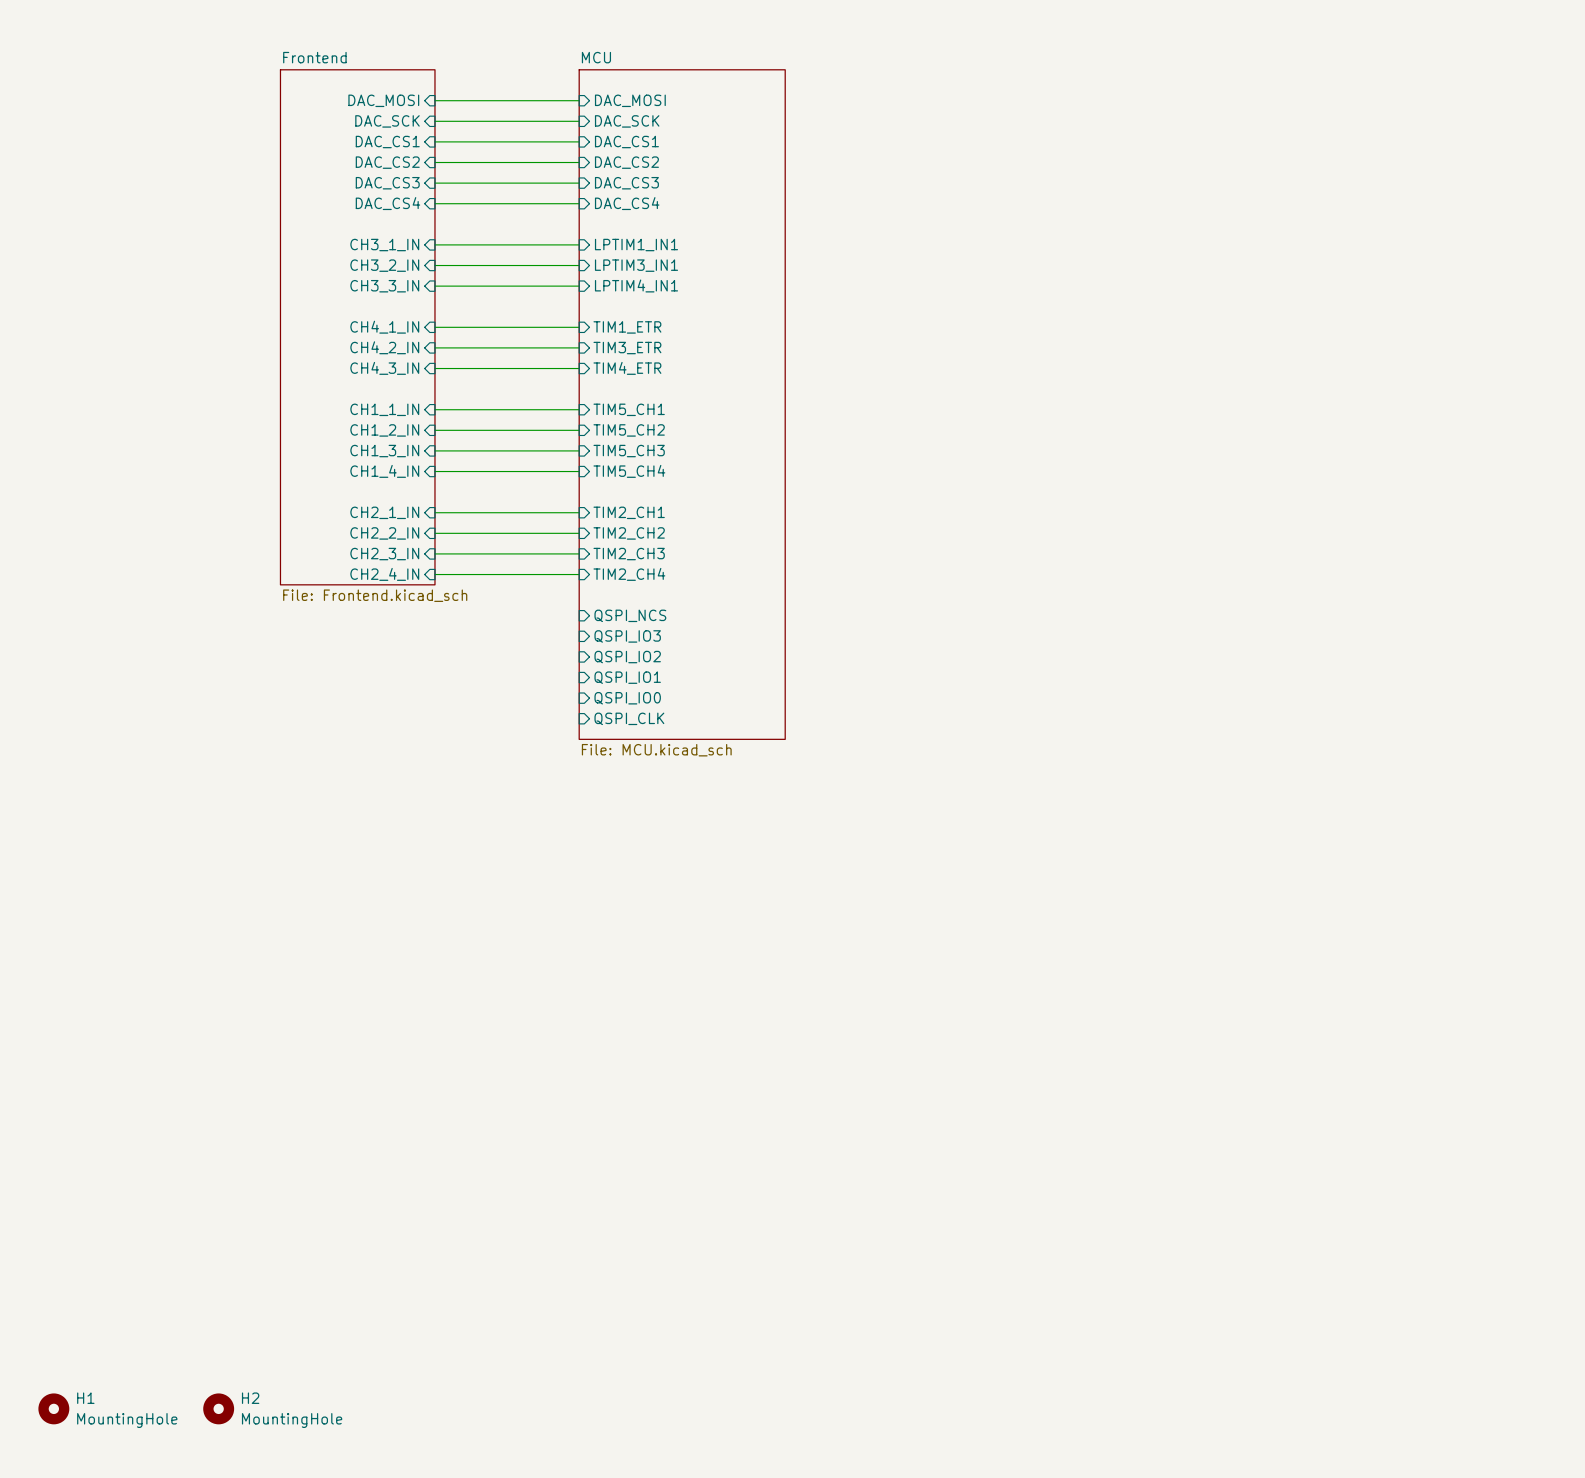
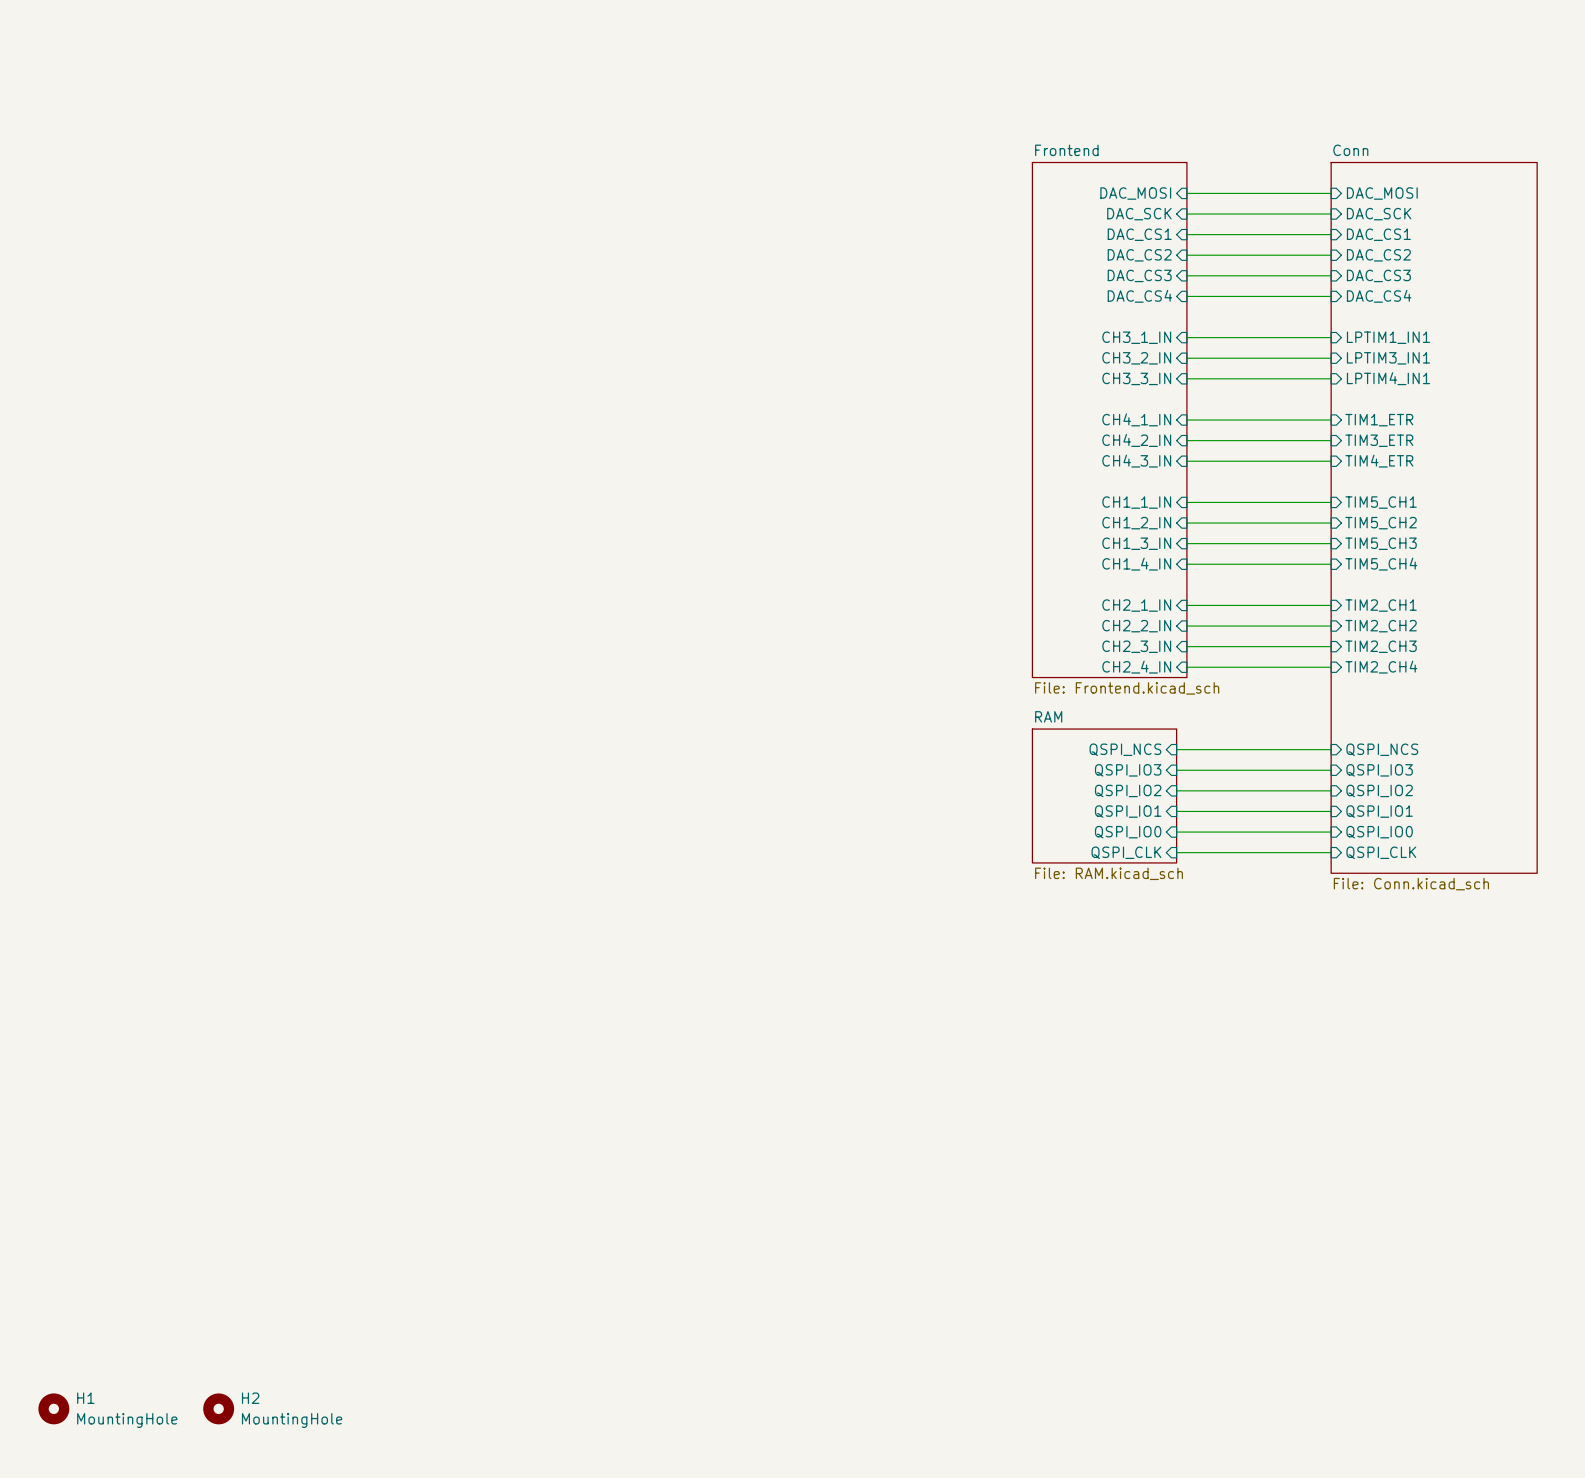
sheet pin: DAC_MOSI (383, 100) -> none
wire: (434, 100) (579, 100) -> none
sheet pin: DAC_MOSI (630, 100) -> none
sheet pin: DAC_SCK (387, 121) -> none
wire: (434, 121) (579, 121) -> none
sheet pin: DAC_SCK (627, 121) -> none
wire: (434, 141) (579, 141) -> none
sheet pin: DAC_CS1 (387, 142) -> none
sheet pin: DAC_CS1 (626, 142) -> none
sheet pin: DAC_CS2 (387, 162) -> none
wire: (434, 162) (579, 162) -> none
sheet pin: DAC_CS2 (626, 162) -> none
sheet pin: DAC_CS3 (387, 183) -> none
wire: (434, 183) (579, 183) -> none
sheet pin: DAC_CS3 (626, 183) -> none
sheet pin: none -> DAC_MOSI (1135, 193)
wire: none -> (1186, 193) (1331, 193)
sheet pin: none -> DAC_MOSI (1382, 193)
sheet pin: DAC_CS4 (387, 203) -> none
wire: (434, 203) (579, 203) -> none
sheet pin: DAC_CS4 (627, 203) -> none
sheet pin: none -> DAC_SCK (1139, 214)
wire: none -> (1186, 214) (1331, 214)
sheet pin: none -> DAC_SCK (1379, 214)
sheet pin: none -> DAC_CS1 (1139, 234)
wire: none -> (1186, 234) (1331, 234)
sheet pin: none -> DAC_CS1 (1378, 234)
wire: (434, 244) (579, 244) -> none
sheet pin: CH3_1_IN (384, 245) -> none
sheet pin: LPTIM1_IN1 (636, 245) -> none
sheet pin: none -> DAC_CS2 (1139, 255)
wire: none -> (1186, 255) (1331, 255)
sheet pin: none -> DAC_CS2 (1378, 255)
sheet pin: CH3_2_IN (384, 265) -> none
wire: (434, 265) (579, 265) -> none
sheet pin: LPTIM3_IN1 (636, 265) -> none
sheet pin: none -> DAC_CS3 (1139, 275)
wire: none -> (1186, 275) (1331, 275)
sheet pin: none -> DAC_CS3 (1378, 275)
sheet pin: LPTIM4_IN1 (636, 285) -> none
sheet pin: CH3_3_IN (384, 286) -> none
wire: (434, 286) (579, 286) -> none
sheet pin: none -> DAC_CS4 (1139, 296)
wire: none -> (1186, 296) (1331, 296)
sheet pin: none -> DAC_CS4 (1379, 296)
sheet Frontend: File: Frontend.kicad_sch (357, 327) -> none
sheet pin: CH4_1_IN (384, 327) -> none
wire: (434, 327) (579, 327) -> none
sheet pin: TIM1_ETR (627, 327) -> none
sheet pin: none -> CH3_1_IN (1136, 337)
wire: none -> (1186, 337) (1331, 337)
sheet pin: none -> LPTIM1_IN1 (1388, 337)
sheet pin: CH4_2_IN (384, 347) -> none
wire: (434, 347) (579, 347) -> none
sheet pin: TIM3_ETR (627, 348) -> none
sheet pin: none -> CH3_2_IN (1136, 358)
wire: none -> (1186, 358) (1331, 358)
sheet pin: none -> LPTIM3_IN1 (1388, 358)
sheet pin: CH4_3_IN (384, 368) -> none
wire: (434, 368) (579, 368) -> none
sheet pin: TIM4_ETR (627, 368) -> none
sheet pin: none -> CH3_3_IN (1136, 378)
wire: none -> (1186, 378) (1331, 378)
sheet pin: none -> LPTIM4_IN1 (1388, 378)
sheet MCU: File: MCU.kicad_sch (682, 404) -> none
sheet pin: CH1_1_IN (384, 409) -> none
wire: (434, 409) (579, 409) -> none
sheet pin: TIM5_CH1 (629, 409) -> none
sheet pin: none -> CH4_1_IN (1136, 419)
sheet Frontend: none -> File: Frontend.kicad_sch (1109, 420)
wire: none -> (1186, 420) (1331, 420)
sheet pin: none -> TIM1_ETR (1379, 420)
sheet pin: CH1_2_IN (384, 430) -> none
wire: (434, 430) (579, 430) -> none
sheet pin: TIM5_CH2 (629, 430) -> none
sheet pin: none -> CH4_2_IN (1136, 440)
wire: none -> (1186, 440) (1331, 440)
sheet pin: none -> TIM3_ETR (1379, 440)
wire: (434, 450) (579, 450) -> none
sheet pin: CH1_3_IN (384, 451) -> none
sheet pin: TIM5_CH3 (629, 451) -> none
sheet pin: none -> CH4_3_IN (1136, 461)
wire: none -> (1186, 461) (1331, 461)
sheet pin: none -> TIM4_ETR (1379, 461)
sheet pin: CH1_4_IN (384, 471) -> none
wire: (434, 471) (579, 471) -> none
sheet pin: TIM5_CH4 (629, 471) -> none
sheet pin: none -> CH1_1_IN (1136, 502)
wire: none -> (1186, 502) (1331, 502)
sheet pin: none -> TIM5_CH1 (1381, 502)
sheet pin: CH2_1_IN (384, 512) -> none
wire: (434, 512) (579, 512) -> none
sheet pin: TIM2_CH1 (629, 512) -> none
sheet Conn: none -> File: Conn.kicad_sch (1434, 517)
sheet pin: none -> CH1_2_IN (1136, 523)
wire: none -> (1186, 523) (1331, 523)
sheet pin: none -> TIM5_CH2 (1381, 523)
sheet pin: CH2_2_IN (384, 533) -> none
wire: (434, 533) (579, 533) -> none
sheet pin: TIM2_CH2 (629, 533) -> none
sheet pin: none -> CH1_3_IN (1136, 543)
wire: none -> (1186, 543) (1331, 543)
sheet pin: none -> TIM5_CH3 (1381, 543)
wire: (434, 553) (579, 553) -> none
sheet pin: CH2_3_IN (384, 554) -> none
sheet pin: TIM2_CH3 (629, 554) -> none
sheet pin: none -> CH1_4_IN (1136, 564)
wire: none -> (1186, 564) (1331, 564)
sheet pin: none -> TIM5_CH4 (1381, 564)
sheet pin: CH2_4_IN (384, 574) -> none
wire: (434, 574) (579, 574) -> none
sheet pin: TIM2_CH4 (629, 574) -> none
sheet pin: none -> CH2_1_IN (1136, 605)
wire: none -> (1186, 605) (1331, 605)
sheet pin: none -> TIM2_CH1 (1381, 605)
sheet pin: QSPI_NCS (630, 615) -> none
sheet pin: none -> CH2_2_IN (1136, 626)
wire: none -> (1186, 626) (1331, 626)
sheet pin: none -> TIM2_CH2 (1381, 626)
sheet pin: QSPI_IO3 (627, 636) -> none
sheet pin: none -> CH2_3_IN (1136, 646)
wire: none -> (1186, 646) (1331, 646)
sheet pin: none -> TIM2_CH3 (1381, 646)
sheet pin: QSPI_IO2 (627, 657) -> none
sheet pin: none -> CH2_4_IN (1136, 667)
wire: none -> (1186, 667) (1331, 667)
sheet pin: none -> TIM2_CH4 (1381, 667)
sheet pin: QSPI_IO1 (627, 677) -> none
sheet pin: QSPI_IO0 (627, 698) -> none
sheet pin: QSPI_CLK (629, 718) -> none
sheet pin: none -> QSPI_NCS (1125, 749)
wire: none -> (1176, 749) (1331, 749)
sheet pin: none -> QSPI_NCS (1382, 749)
sheet pin: none -> QSPI_IO3 (1128, 770)
wire: none -> (1176, 770) (1331, 770)
sheet pin: none -> QSPI_IO3 (1379, 770)
sheet pin: none -> QSPI_IO2 (1128, 790)
wire: none -> (1176, 790) (1331, 790)
sheet pin: none -> QSPI_IO2 (1379, 790)
sheet RAM: none -> File: RAM.kicad_sch (1104, 795)
sheet pin: none -> QSPI_IO1 (1128, 811)
wire: none -> (1176, 811) (1331, 811)
sheet pin: none -> QSPI_IO1 (1379, 811)
sheet pin: none -> QSPI_IO0 (1128, 832)
wire: none -> (1176, 832) (1331, 832)
sheet pin: none -> QSPI_IO0 (1379, 832)
sheet pin: none -> QSPI_CLK (1126, 852)
wire: none -> (1176, 852) (1331, 852)
sheet pin: none -> QSPI_CLK (1381, 852)

